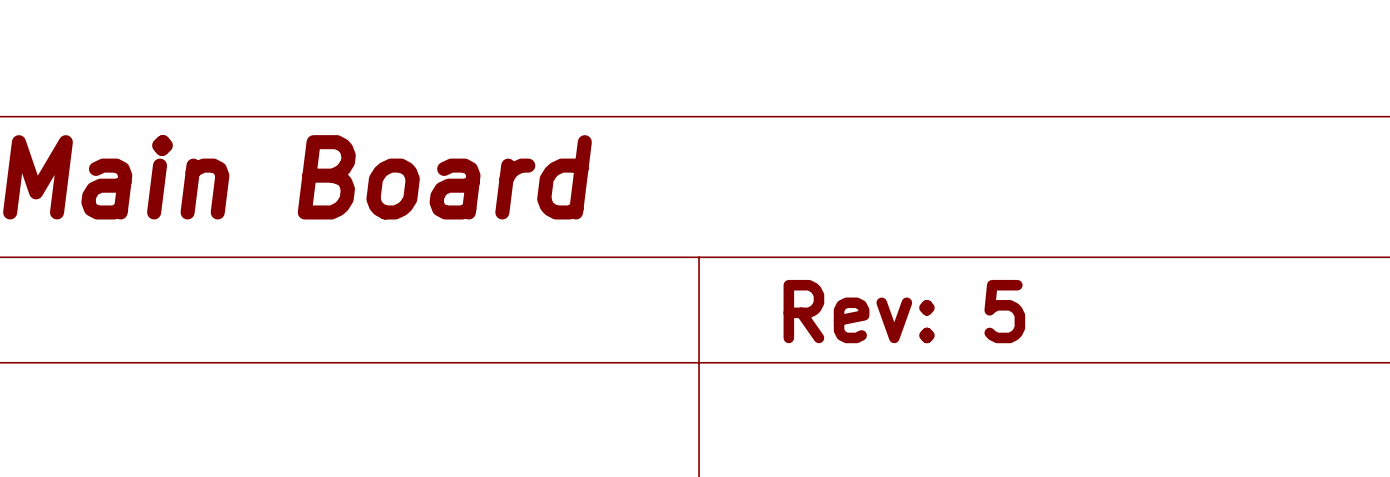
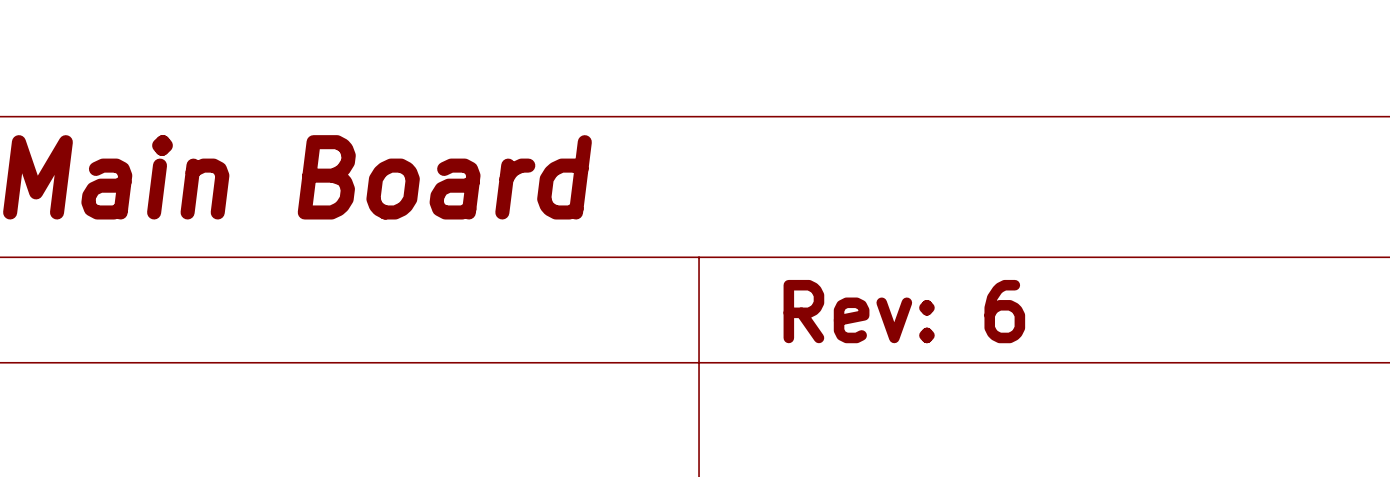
title block: Rev: 5 (904, 311) -> Rev: 6 (904, 311)

